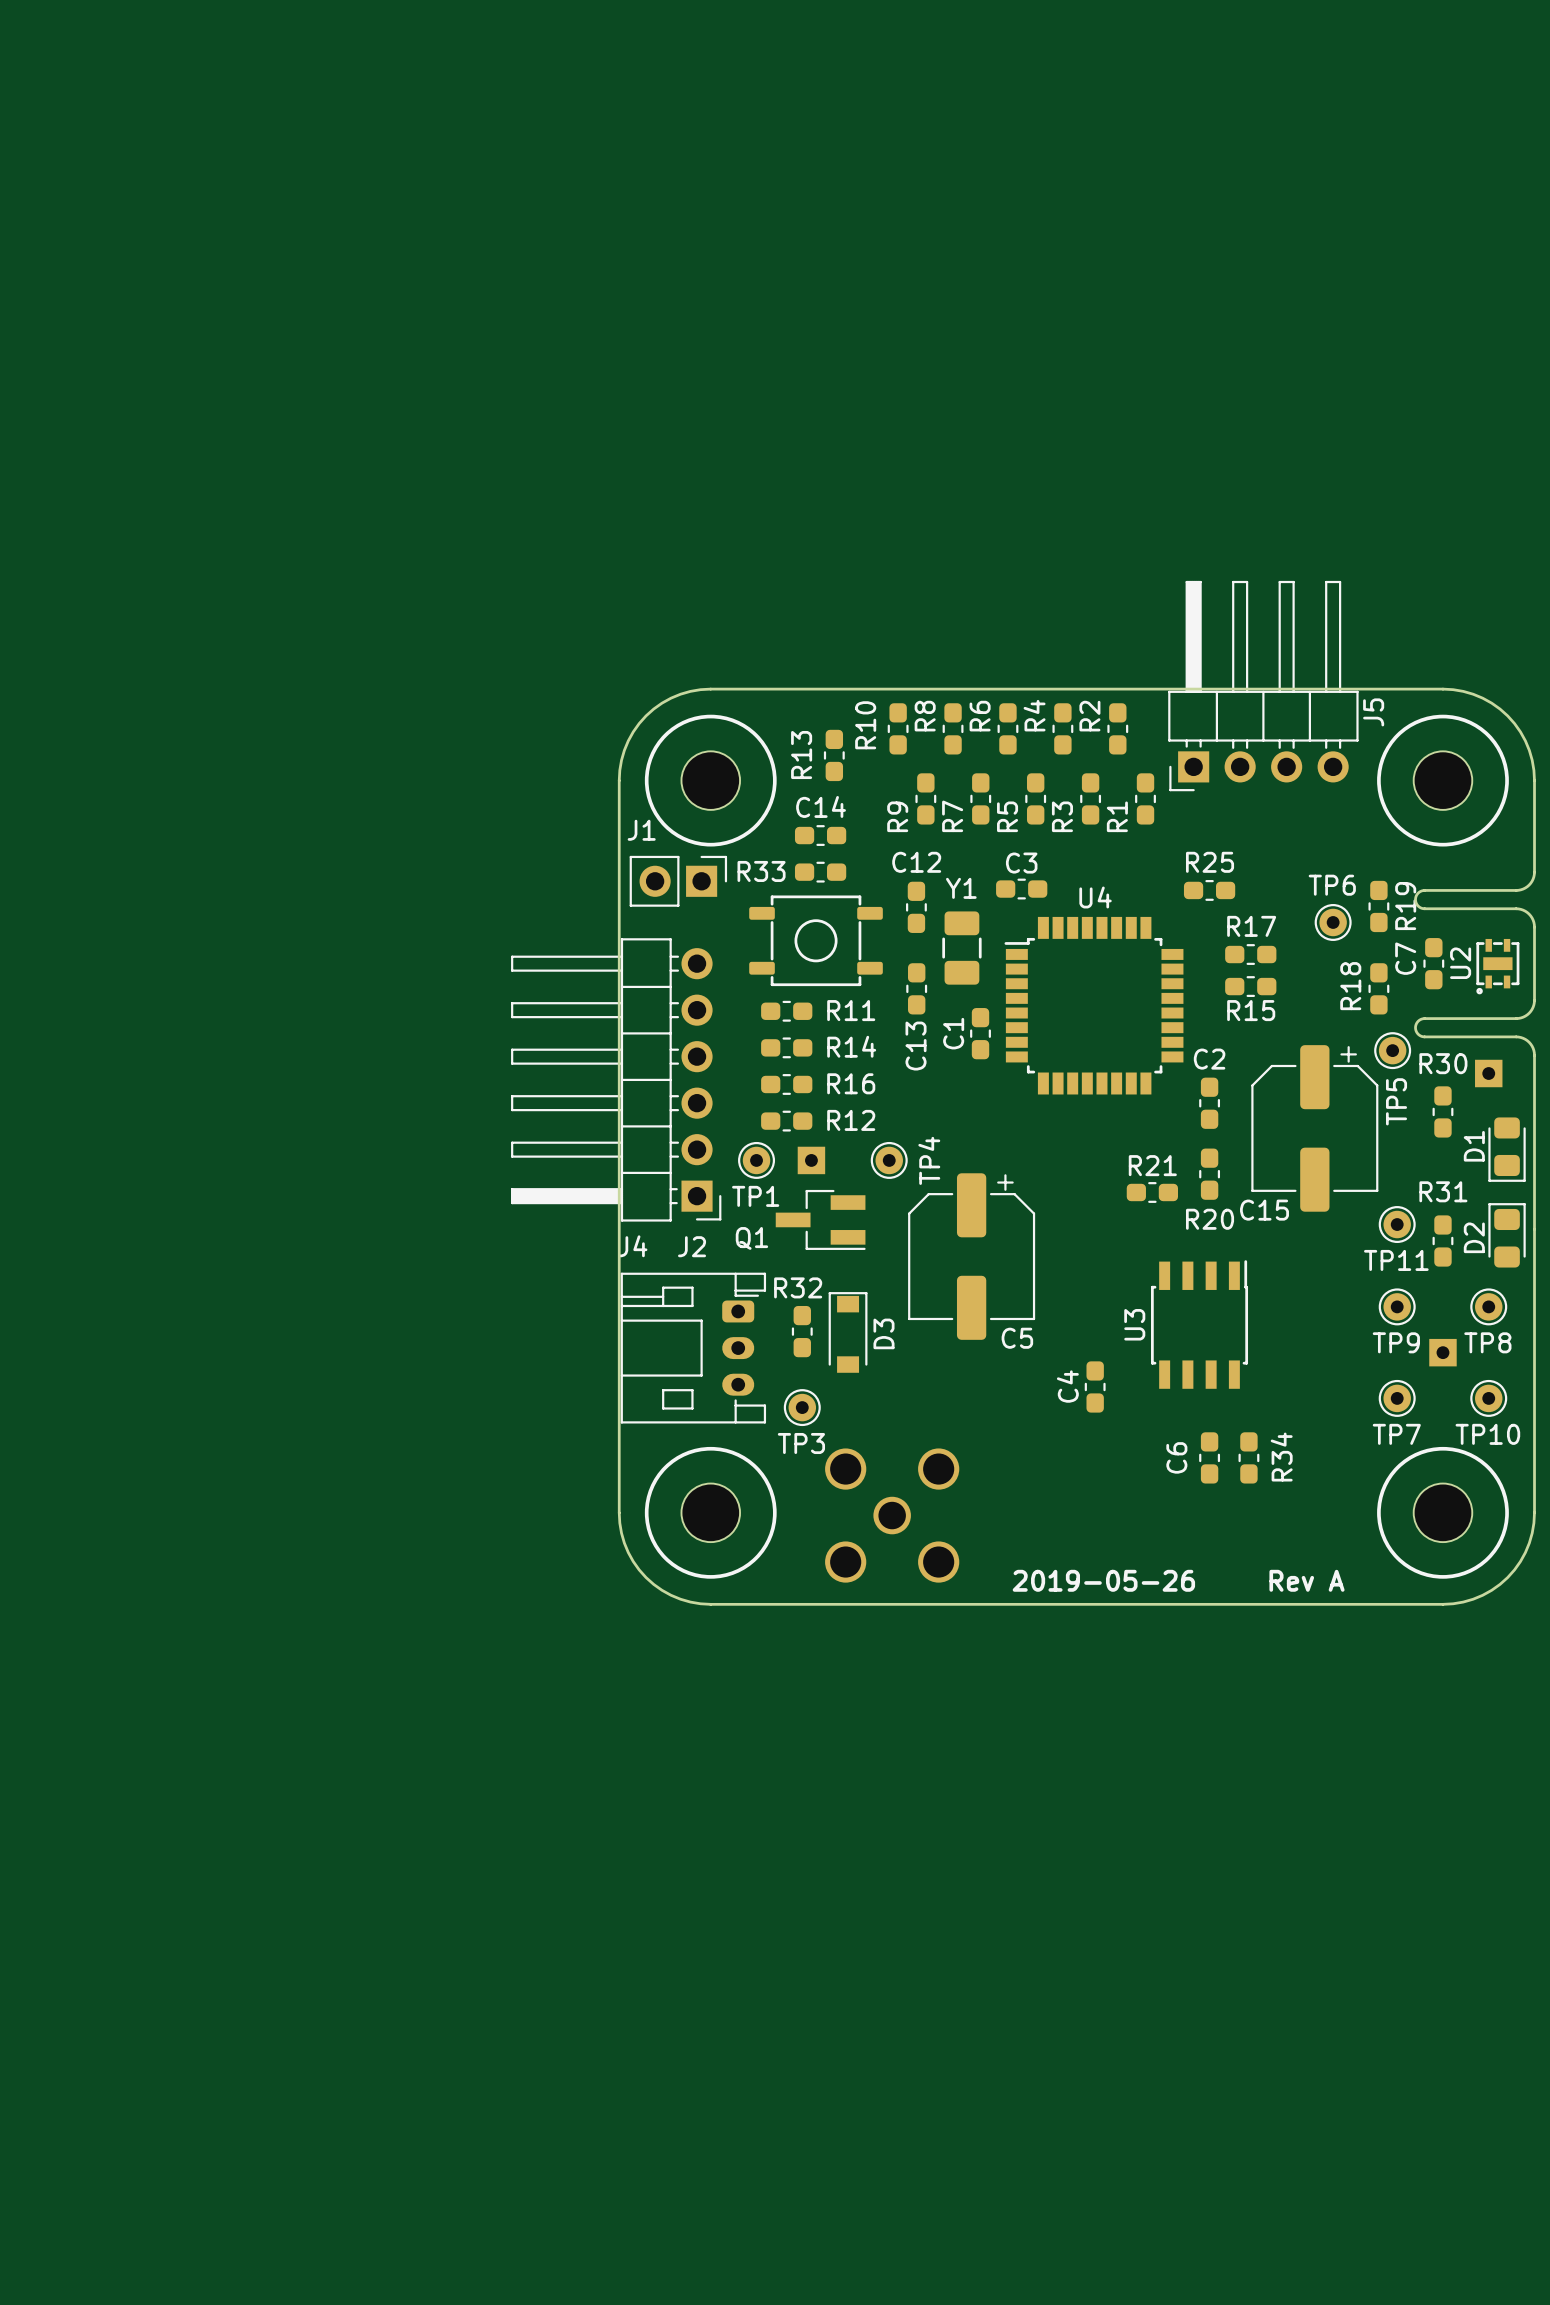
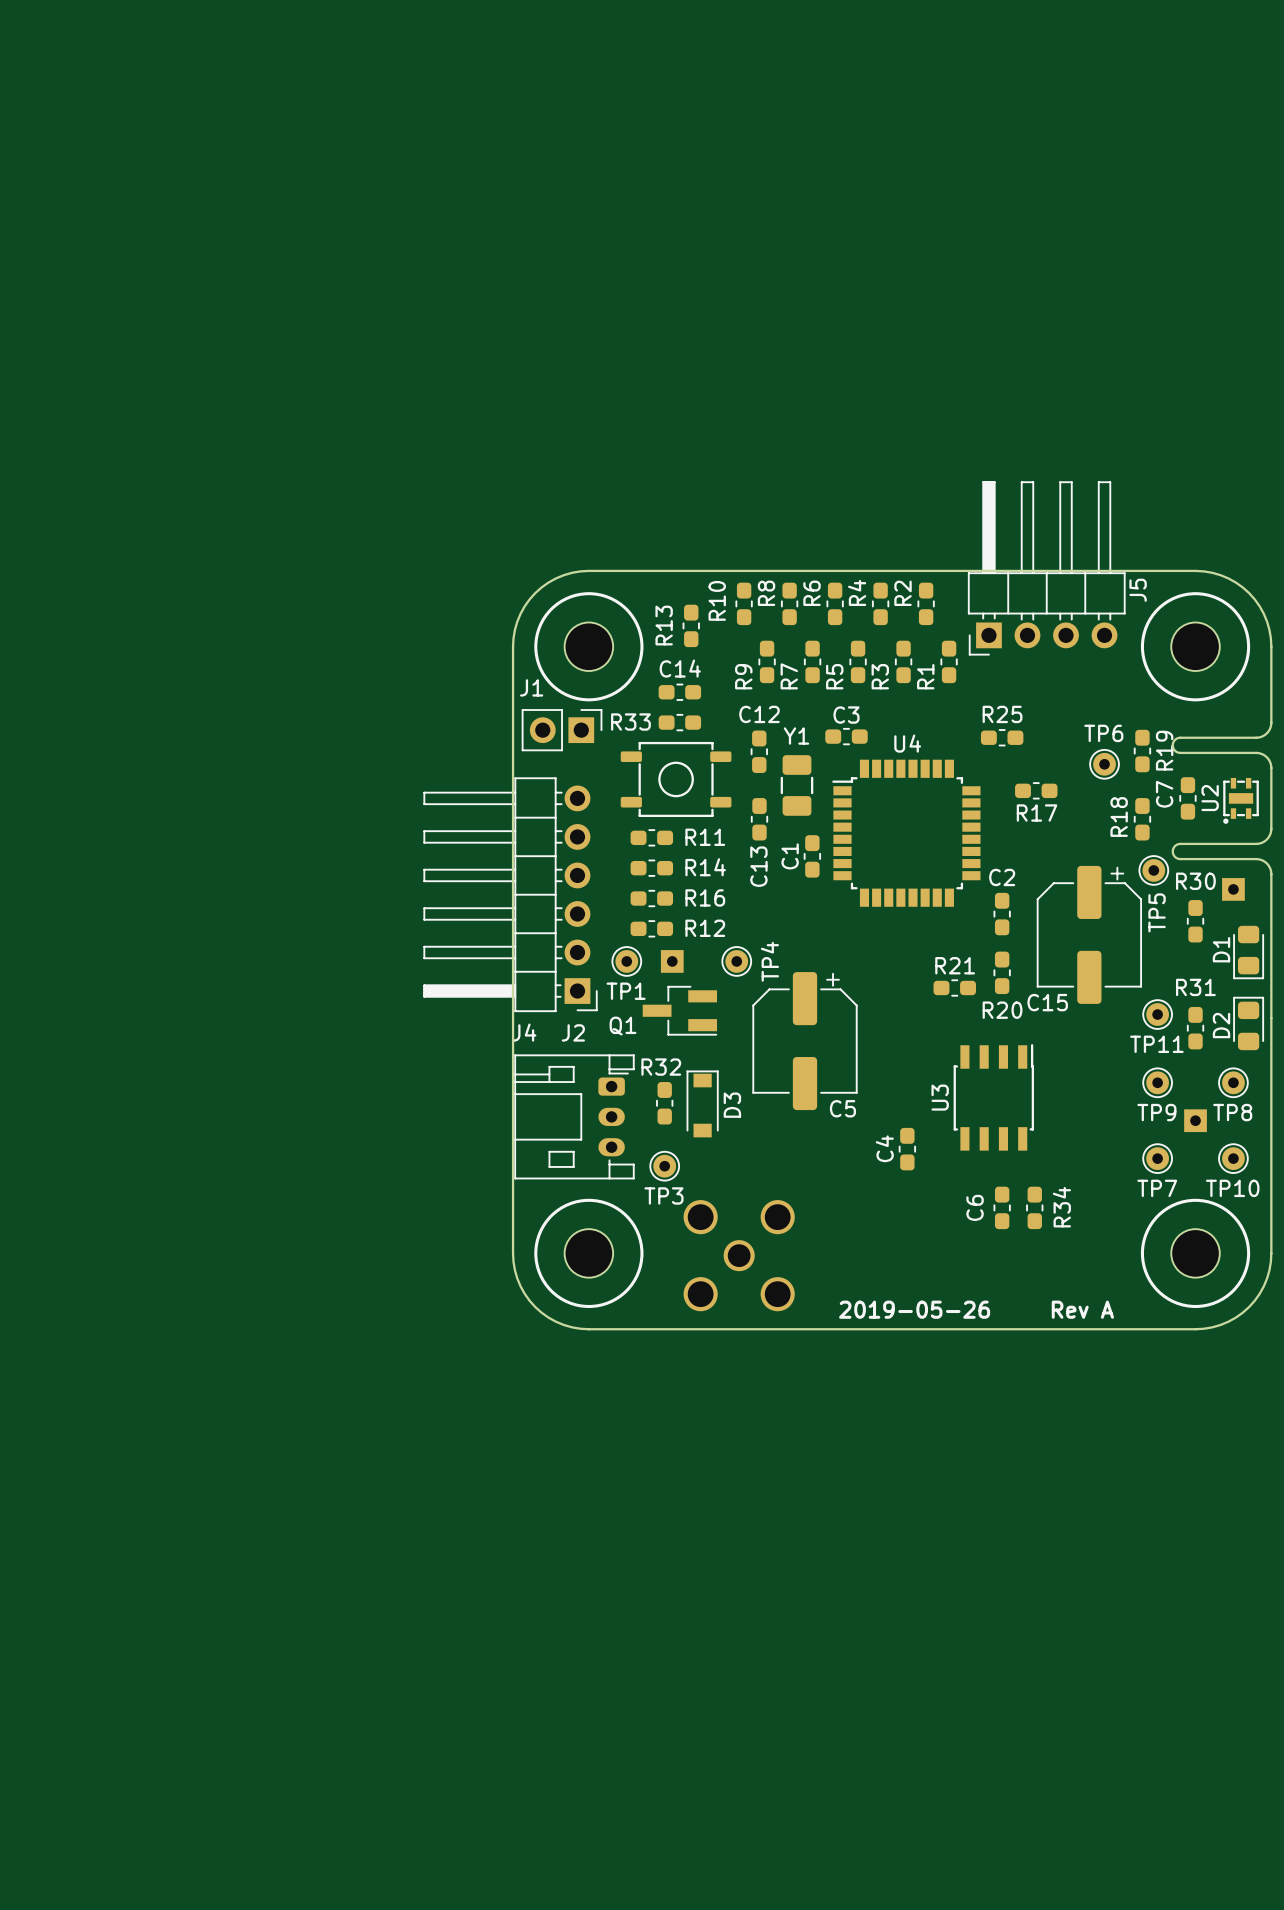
R17 name position: R17 (1251, 926) -> R17 (1037, 813)
R15: (1250, 986) -> none

